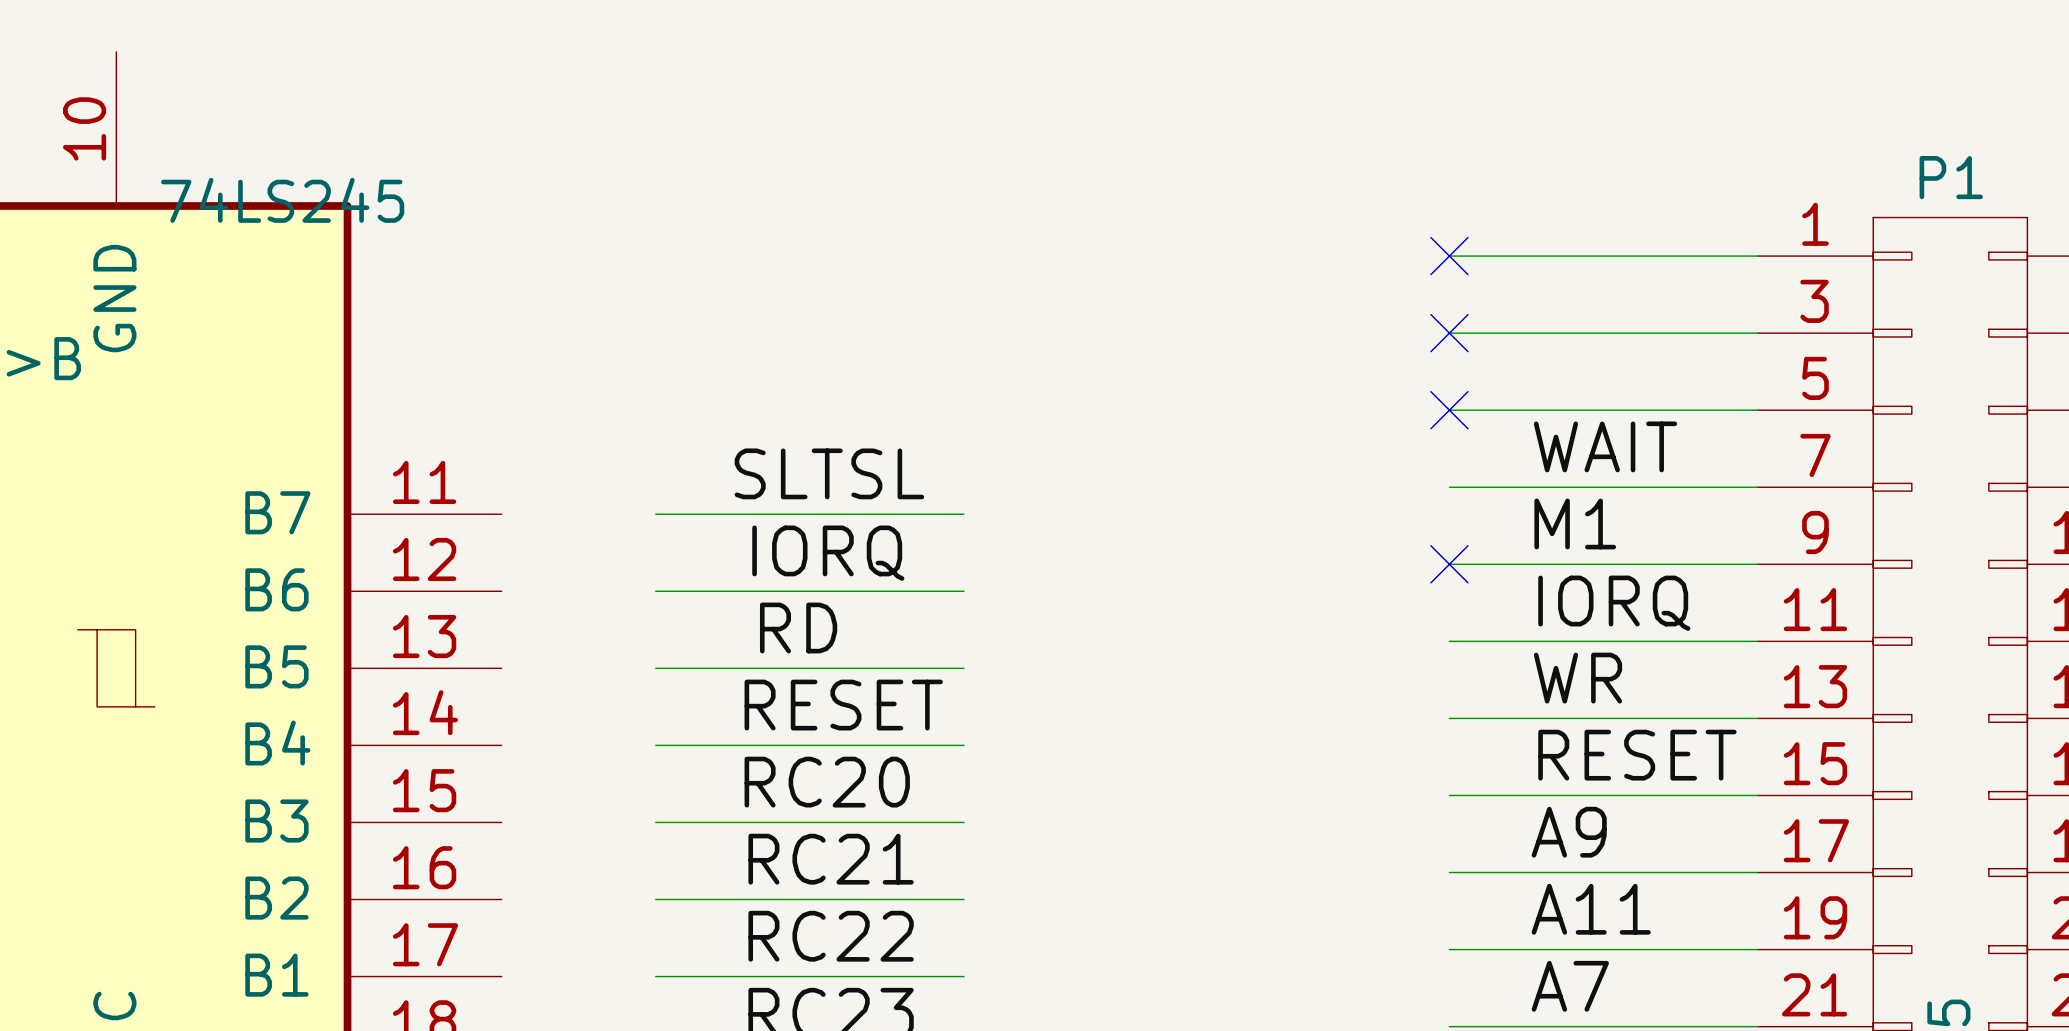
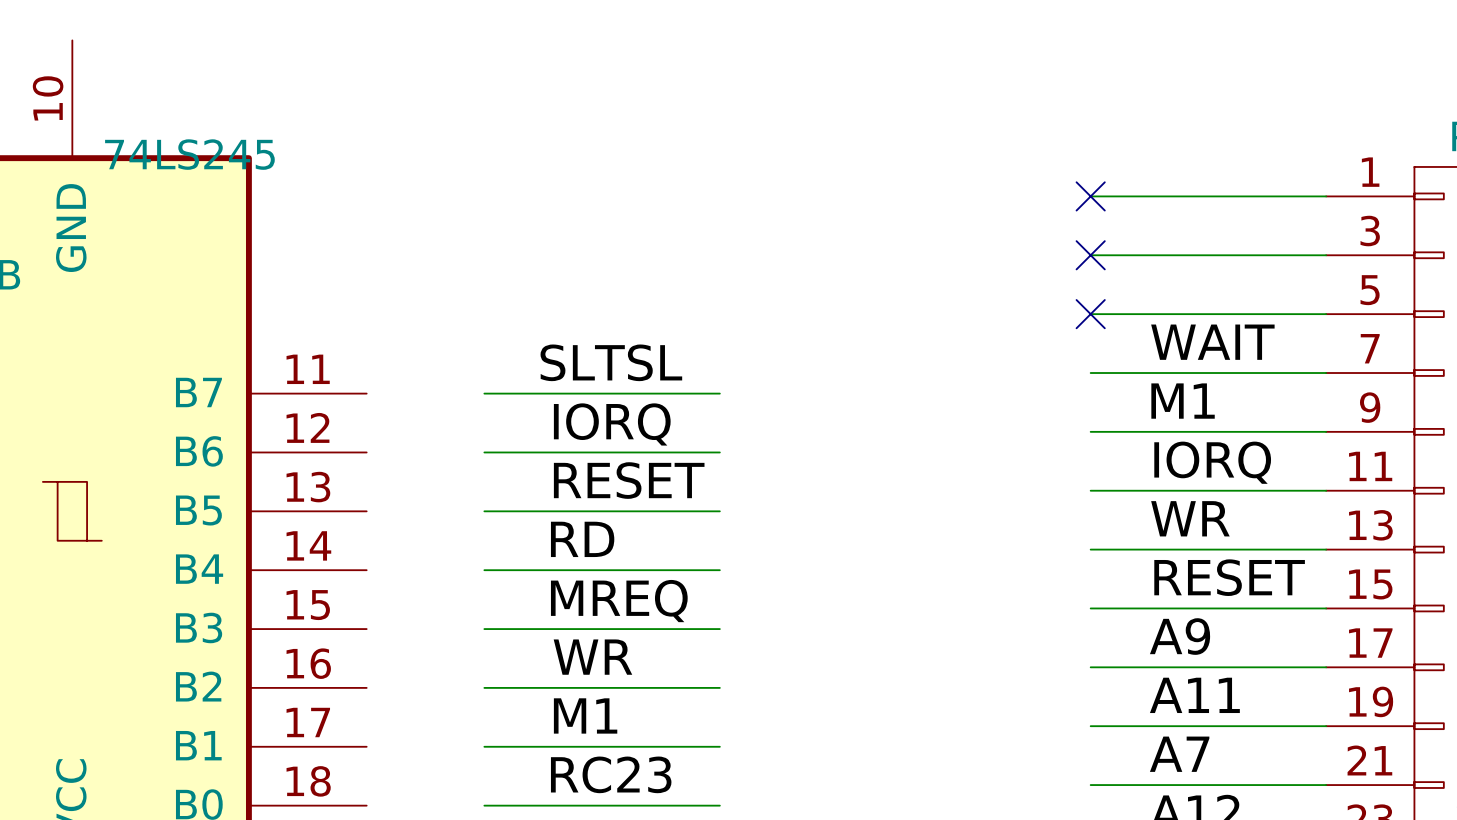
no-connect mark: (1449, 564) -> none
label position: RD (798, 628) -> RD (582, 539)
label position: RESET (843, 705) -> RESET (629, 480)
label: RC20 (827, 782) -> MREQ (619, 601)
label: RC21 (831, 859) -> WR (592, 657)
label: RC22 (831, 936) -> M1 (585, 715)

